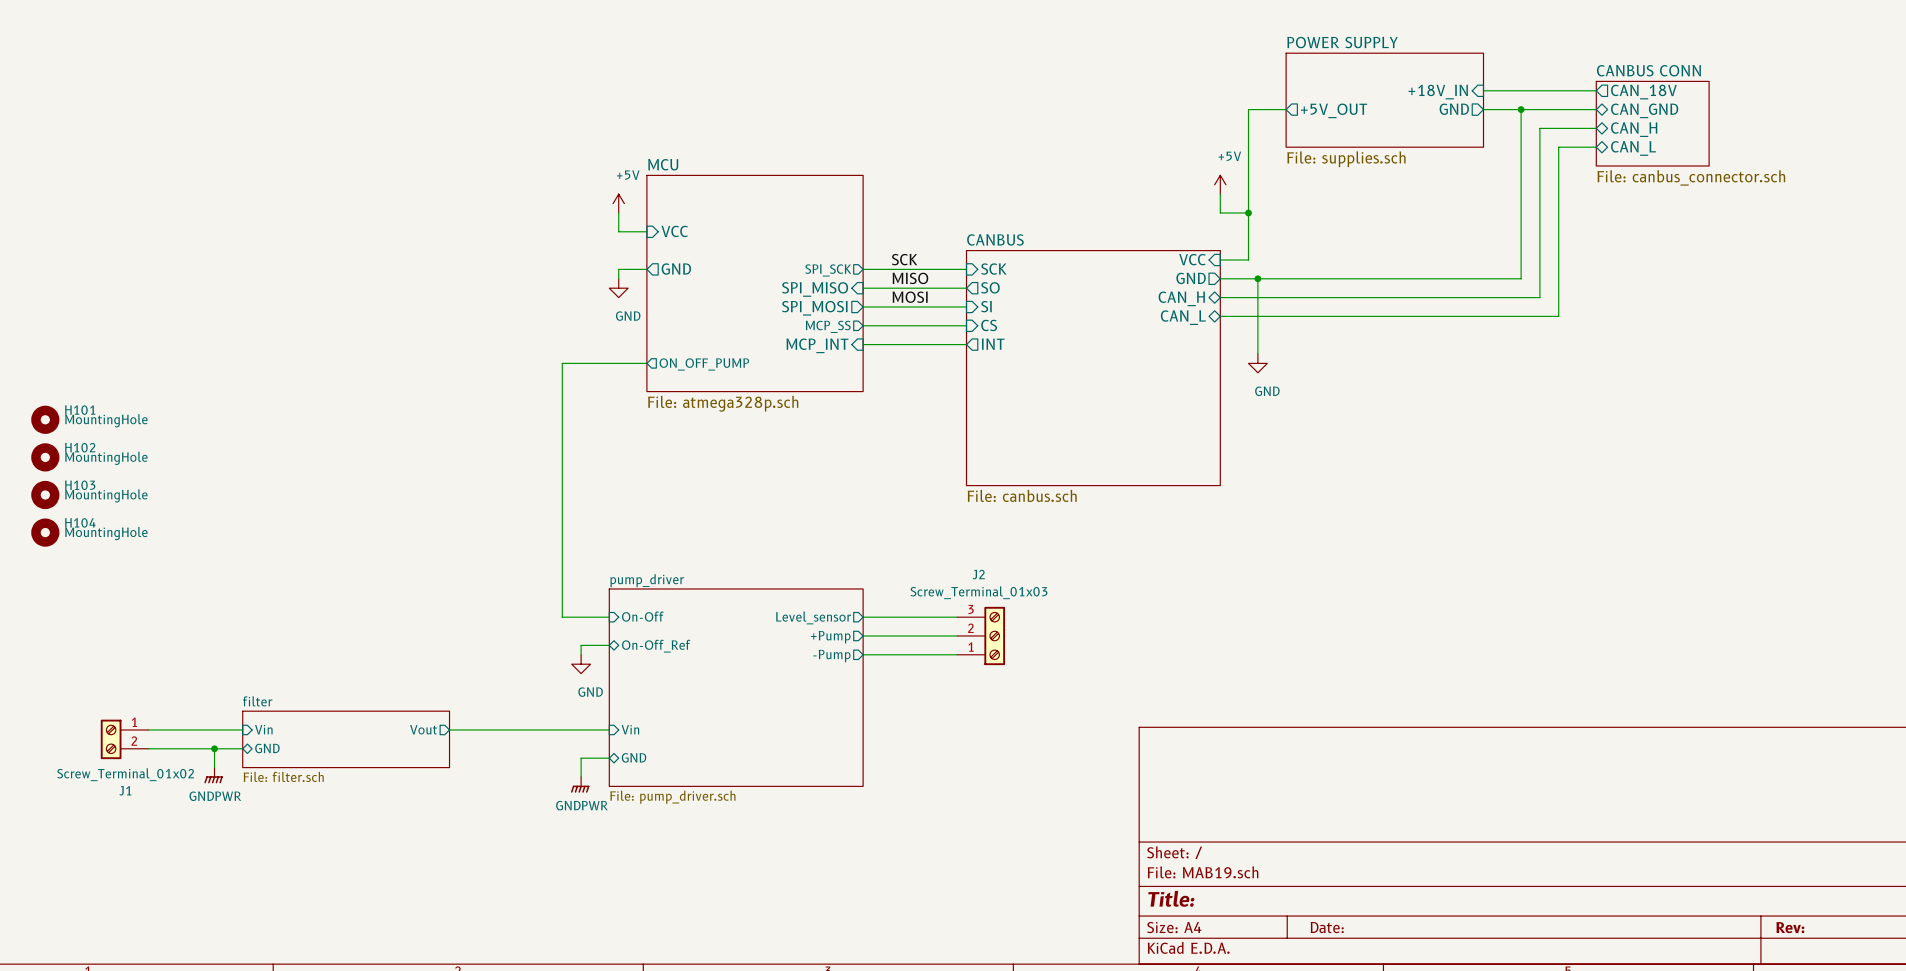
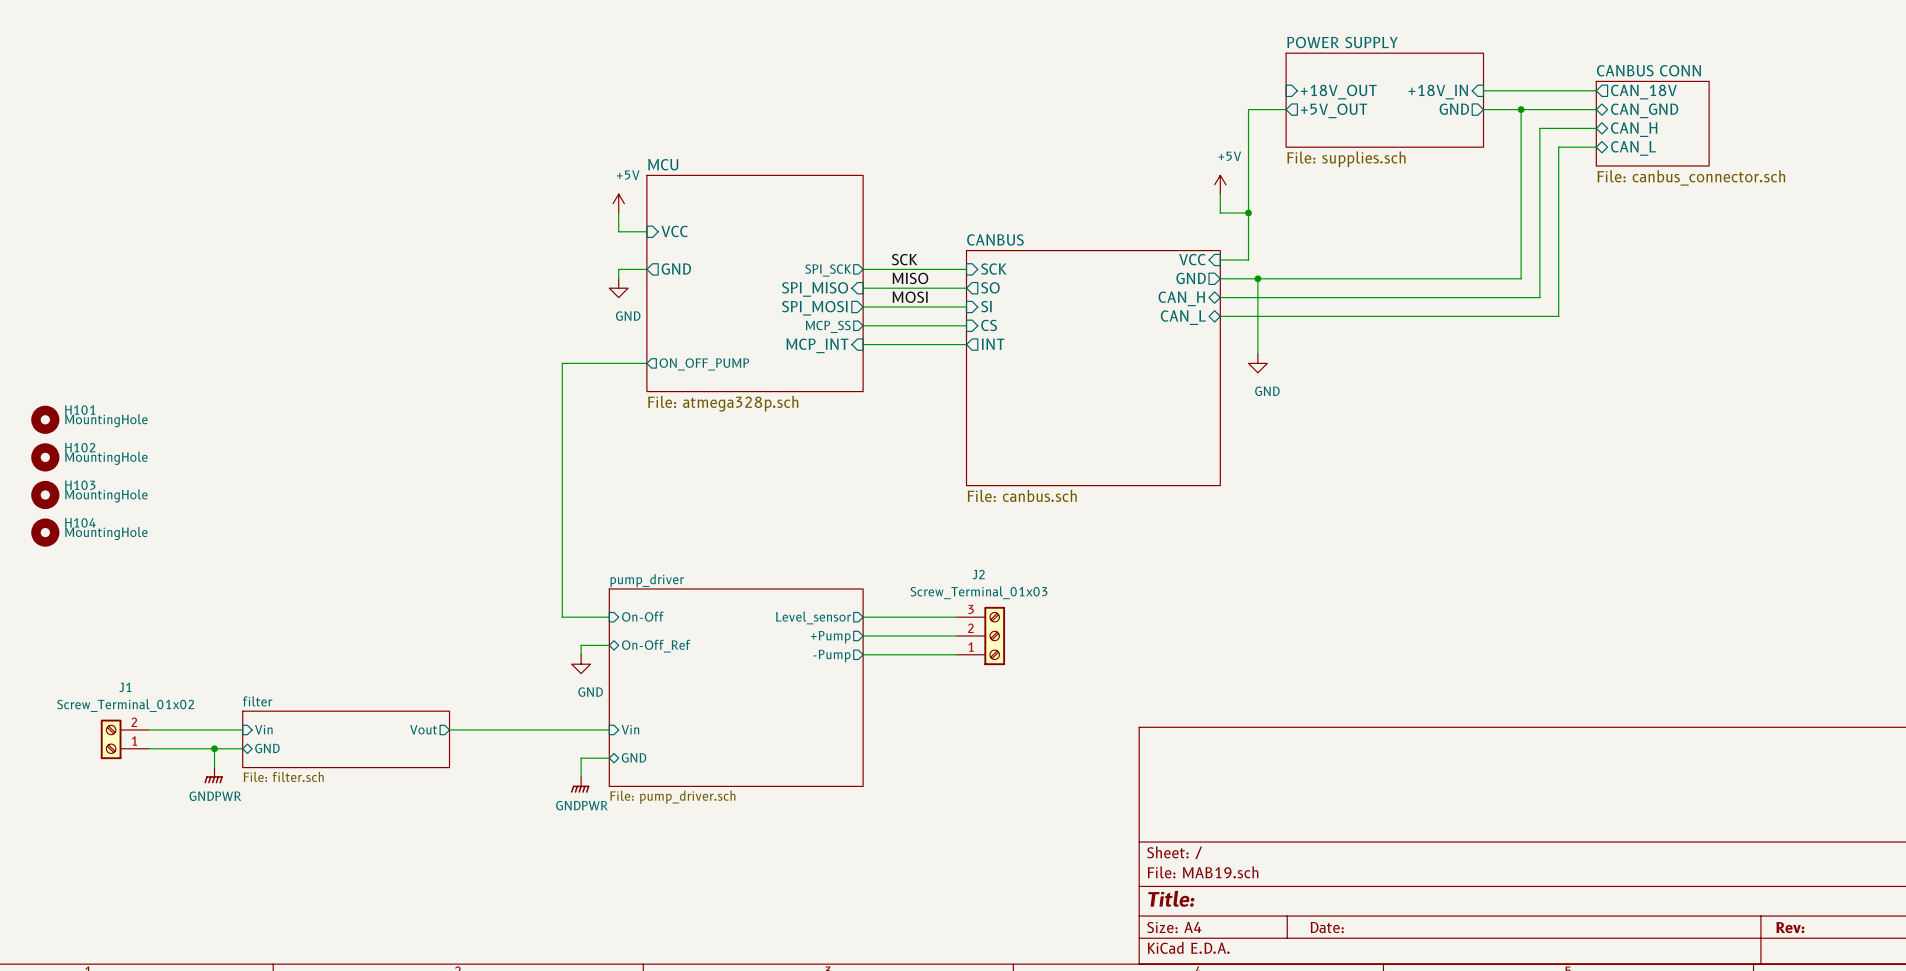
sheet pin: none -> +18V_OUT (1338, 92)
J1 flip: as is (111, 739) -> up-down (111, 739)

